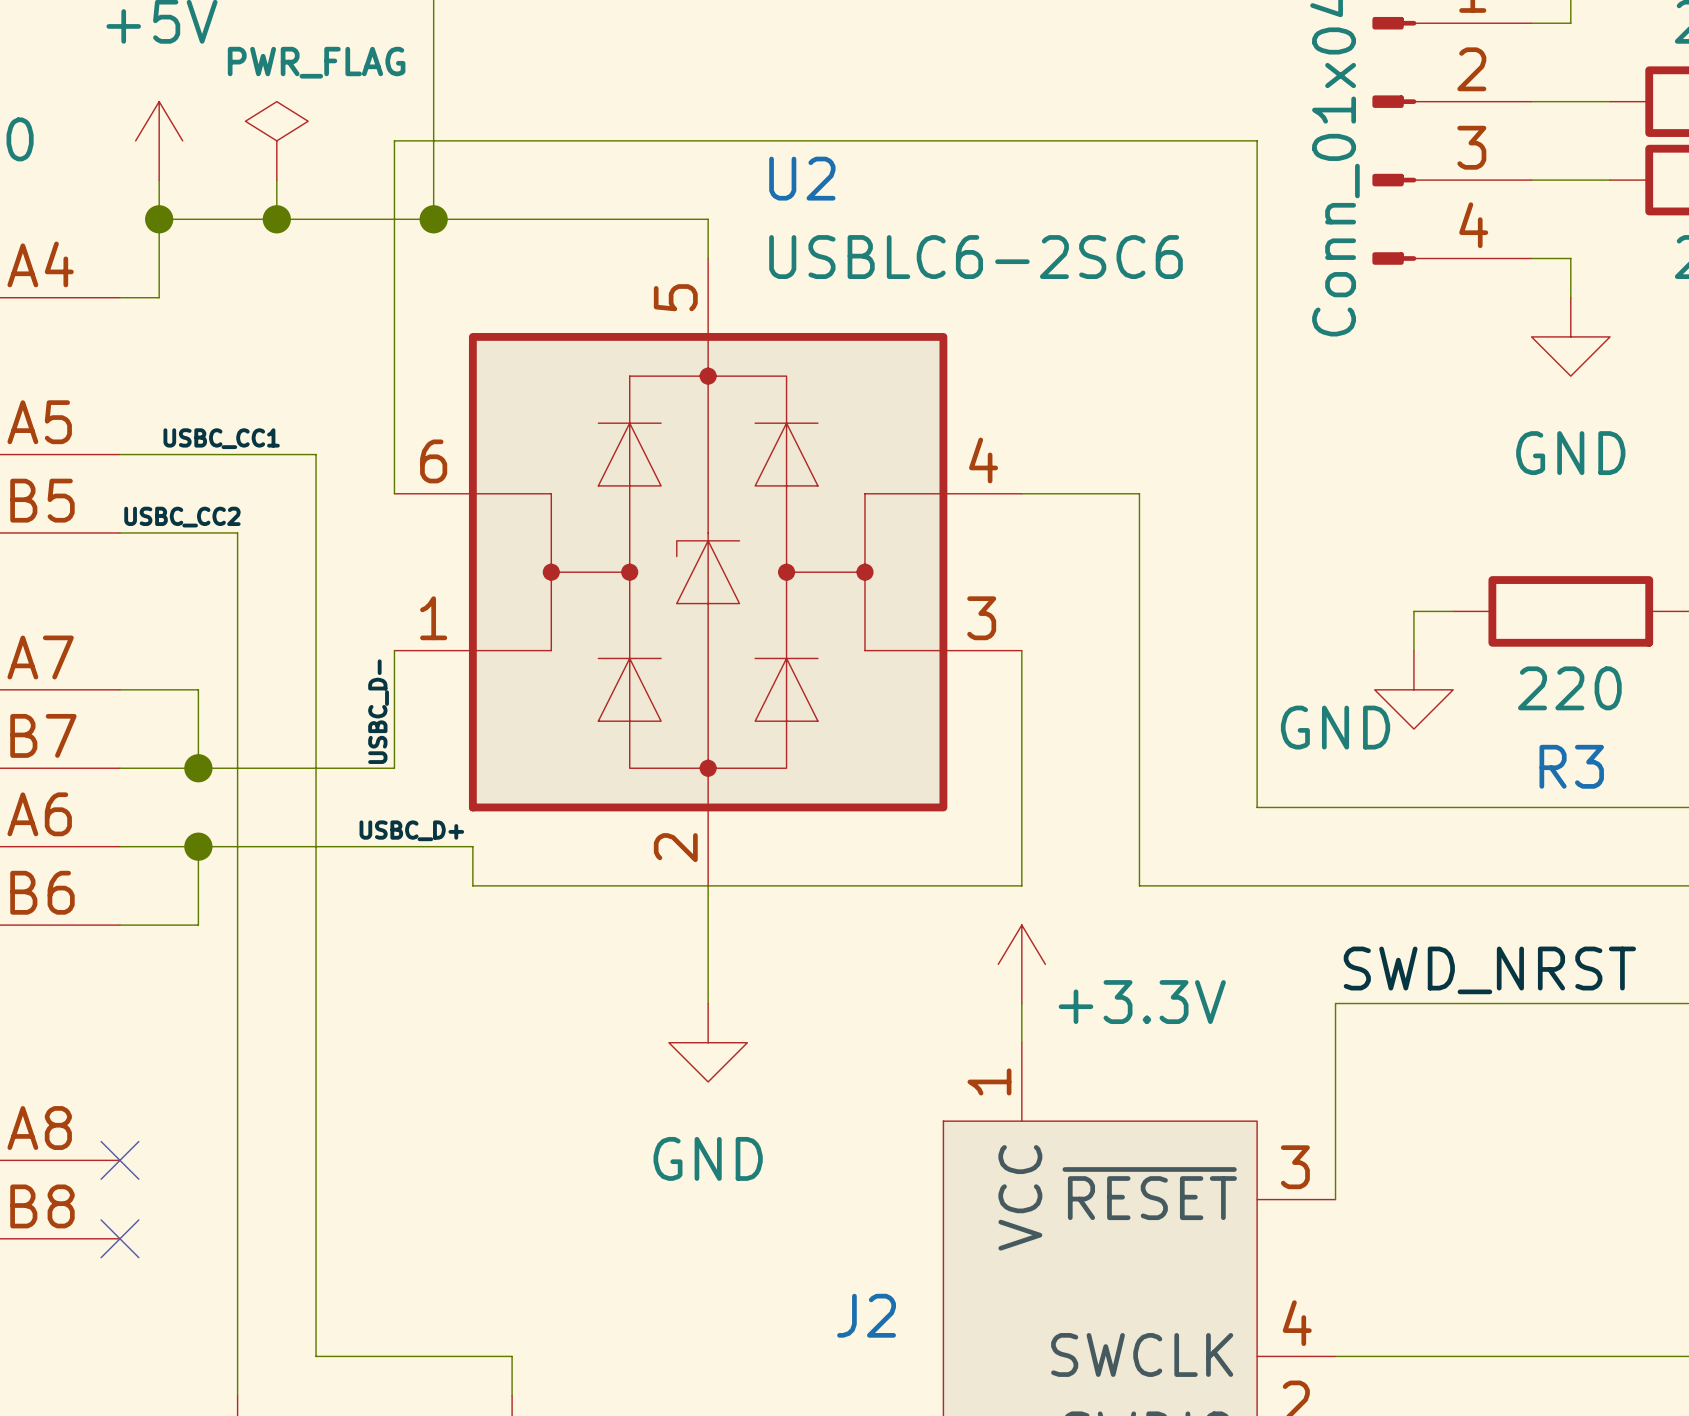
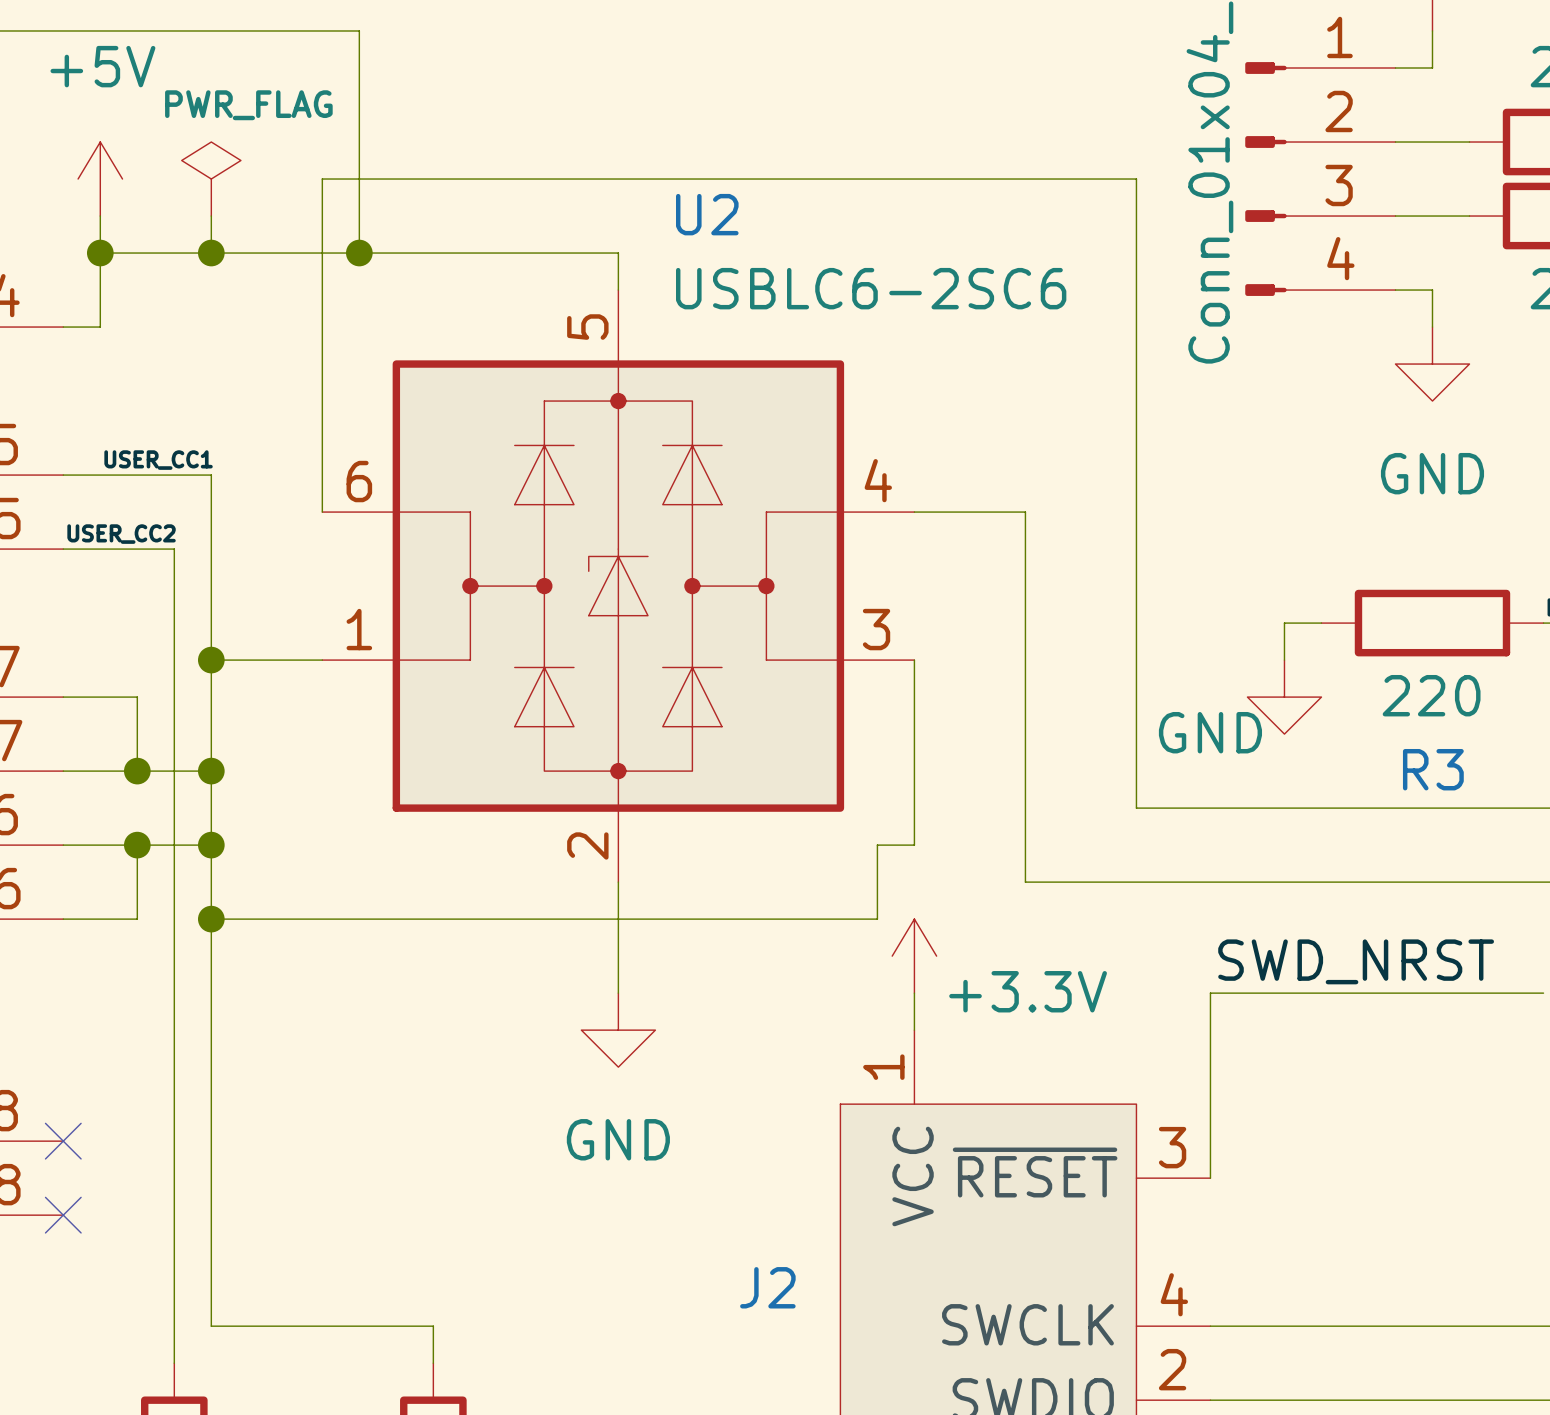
label: USBC_CC1 (221, 438) -> USER_CC1 (158, 460)
wire: (276, 454) (316, 454) (316, 1356) -> (211, 475) (211, 1326) (248, 1326)
label: USBC_CC2 (182, 517) -> USER_CC2 (121, 534)
junction: none -> (211, 660)
wire: (394, 650) (394, 768) (276, 768) -> (322, 660) (211, 660)
label: USBC_D- (378, 711) -> none
junction: none -> (211, 771)
label: USBC_D+ (411, 830) -> none
wire: (276, 846) (472, 846) (472, 885) (1021, 885) (1021, 846) -> (211, 919) (877, 919) (877, 845) (914, 845)
junction: none -> (211, 845)
junction: none -> (211, 919)

